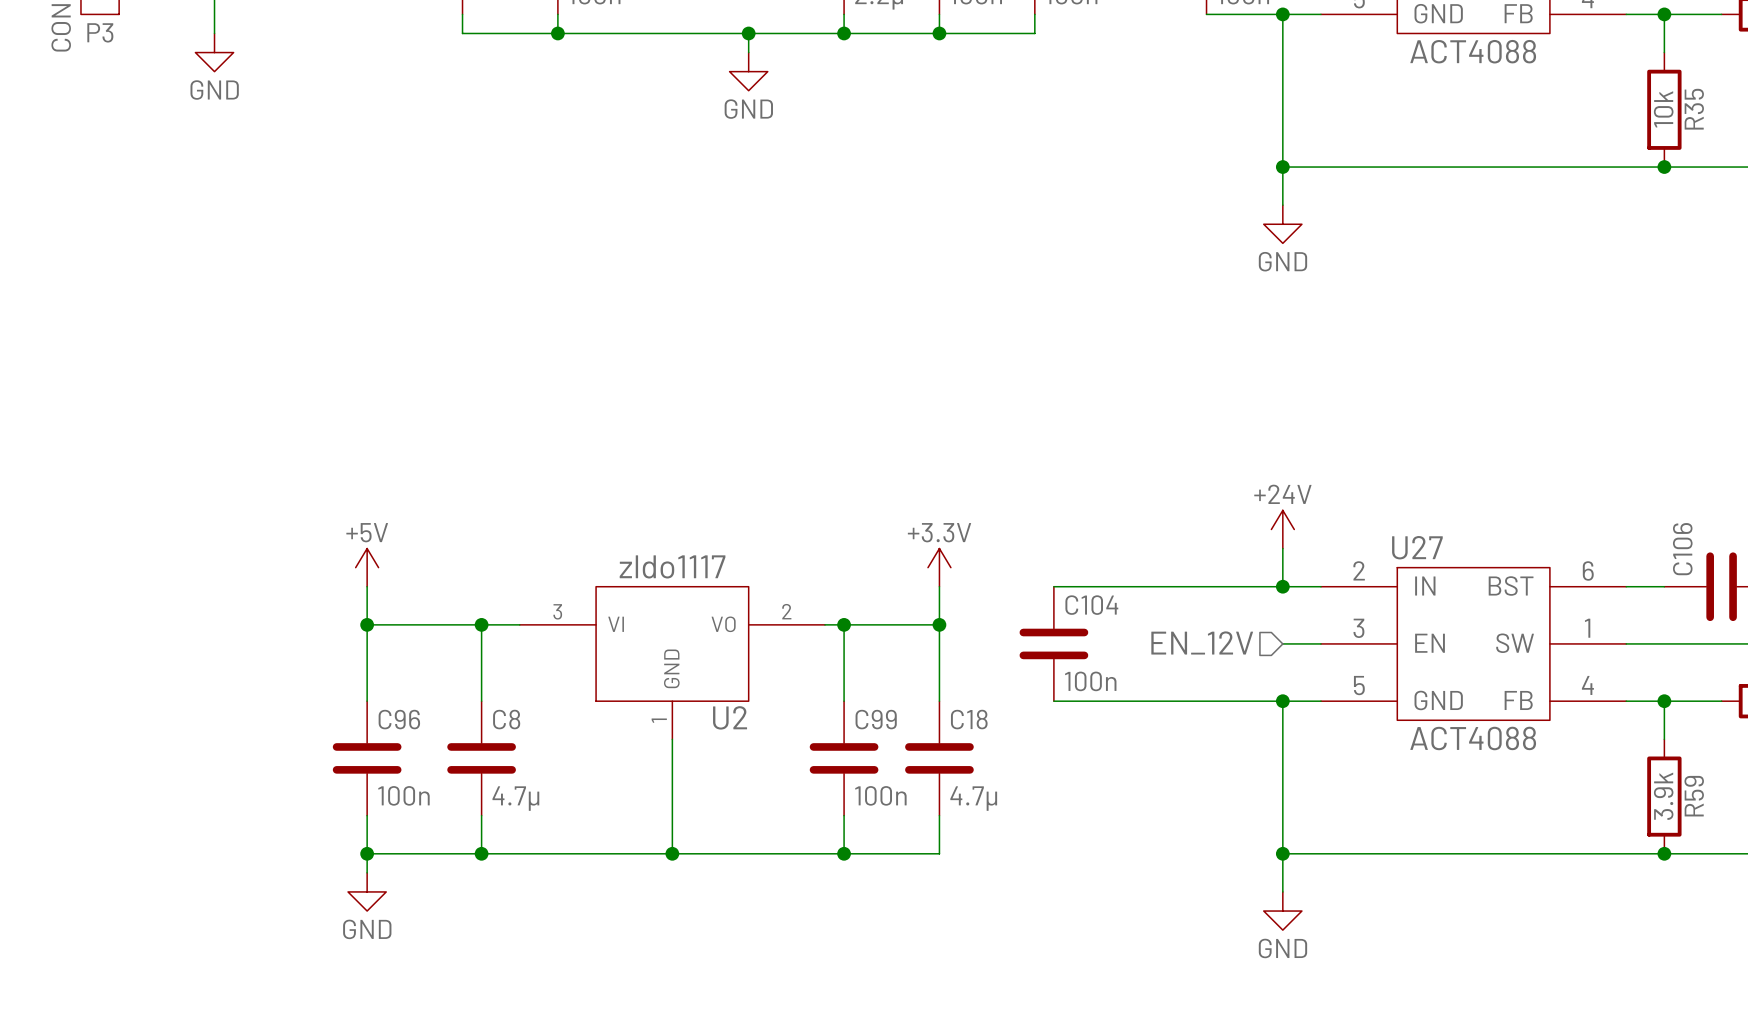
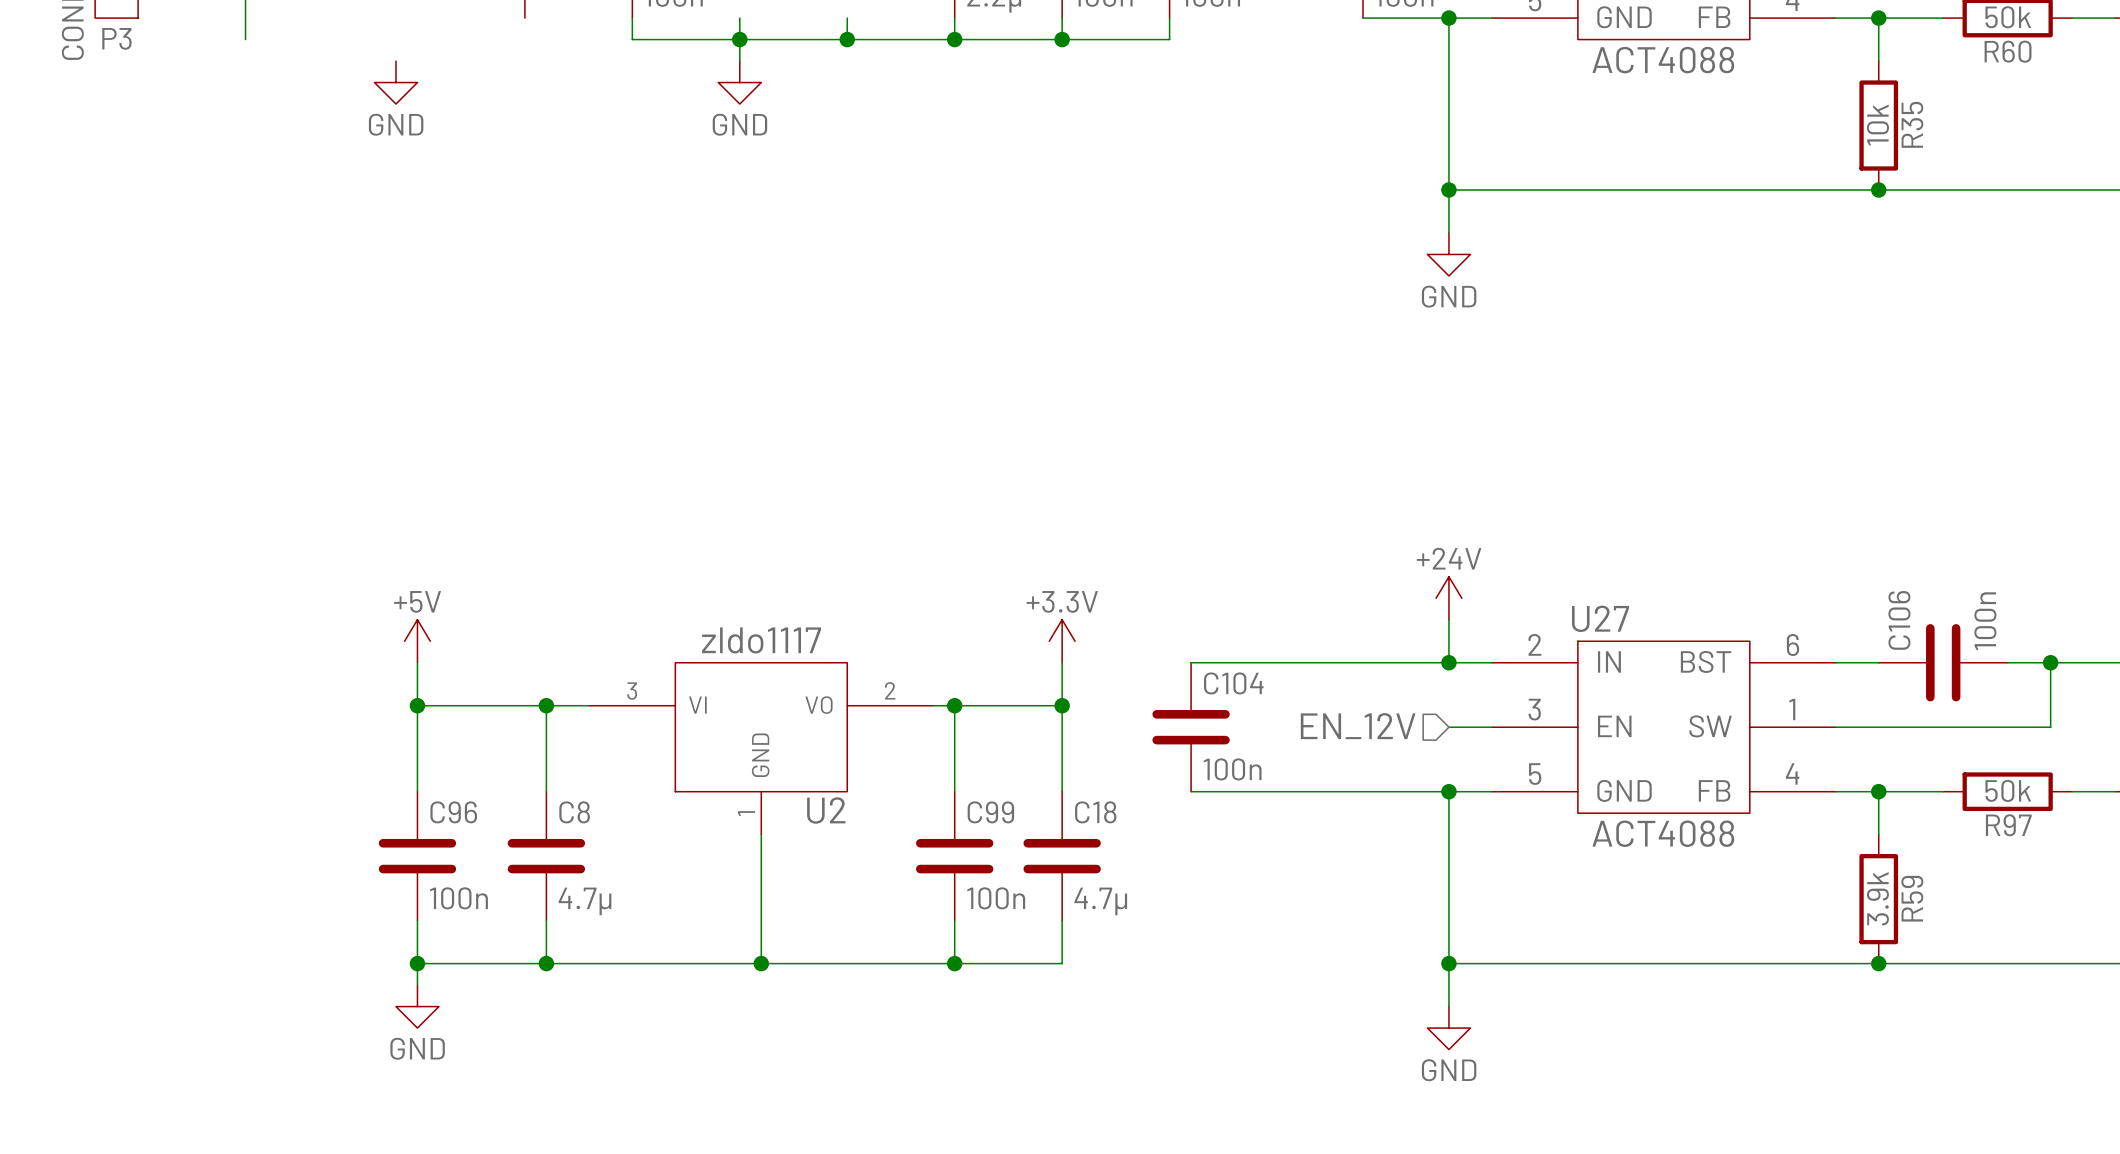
wire: (462, 14) (462, 33) (557, 33) -> none
wire: none -> (739, 18) (739, 61)
junction: (557, 33) -> none
junction: none -> (739, 39)
wire: (748, 33) (748, 52) -> (847, 39) (847, 18)
power symbol position: GND (214, 52) -> GND (395, 82)
power symbol position: GND (748, 71) -> GND (739, 82)

